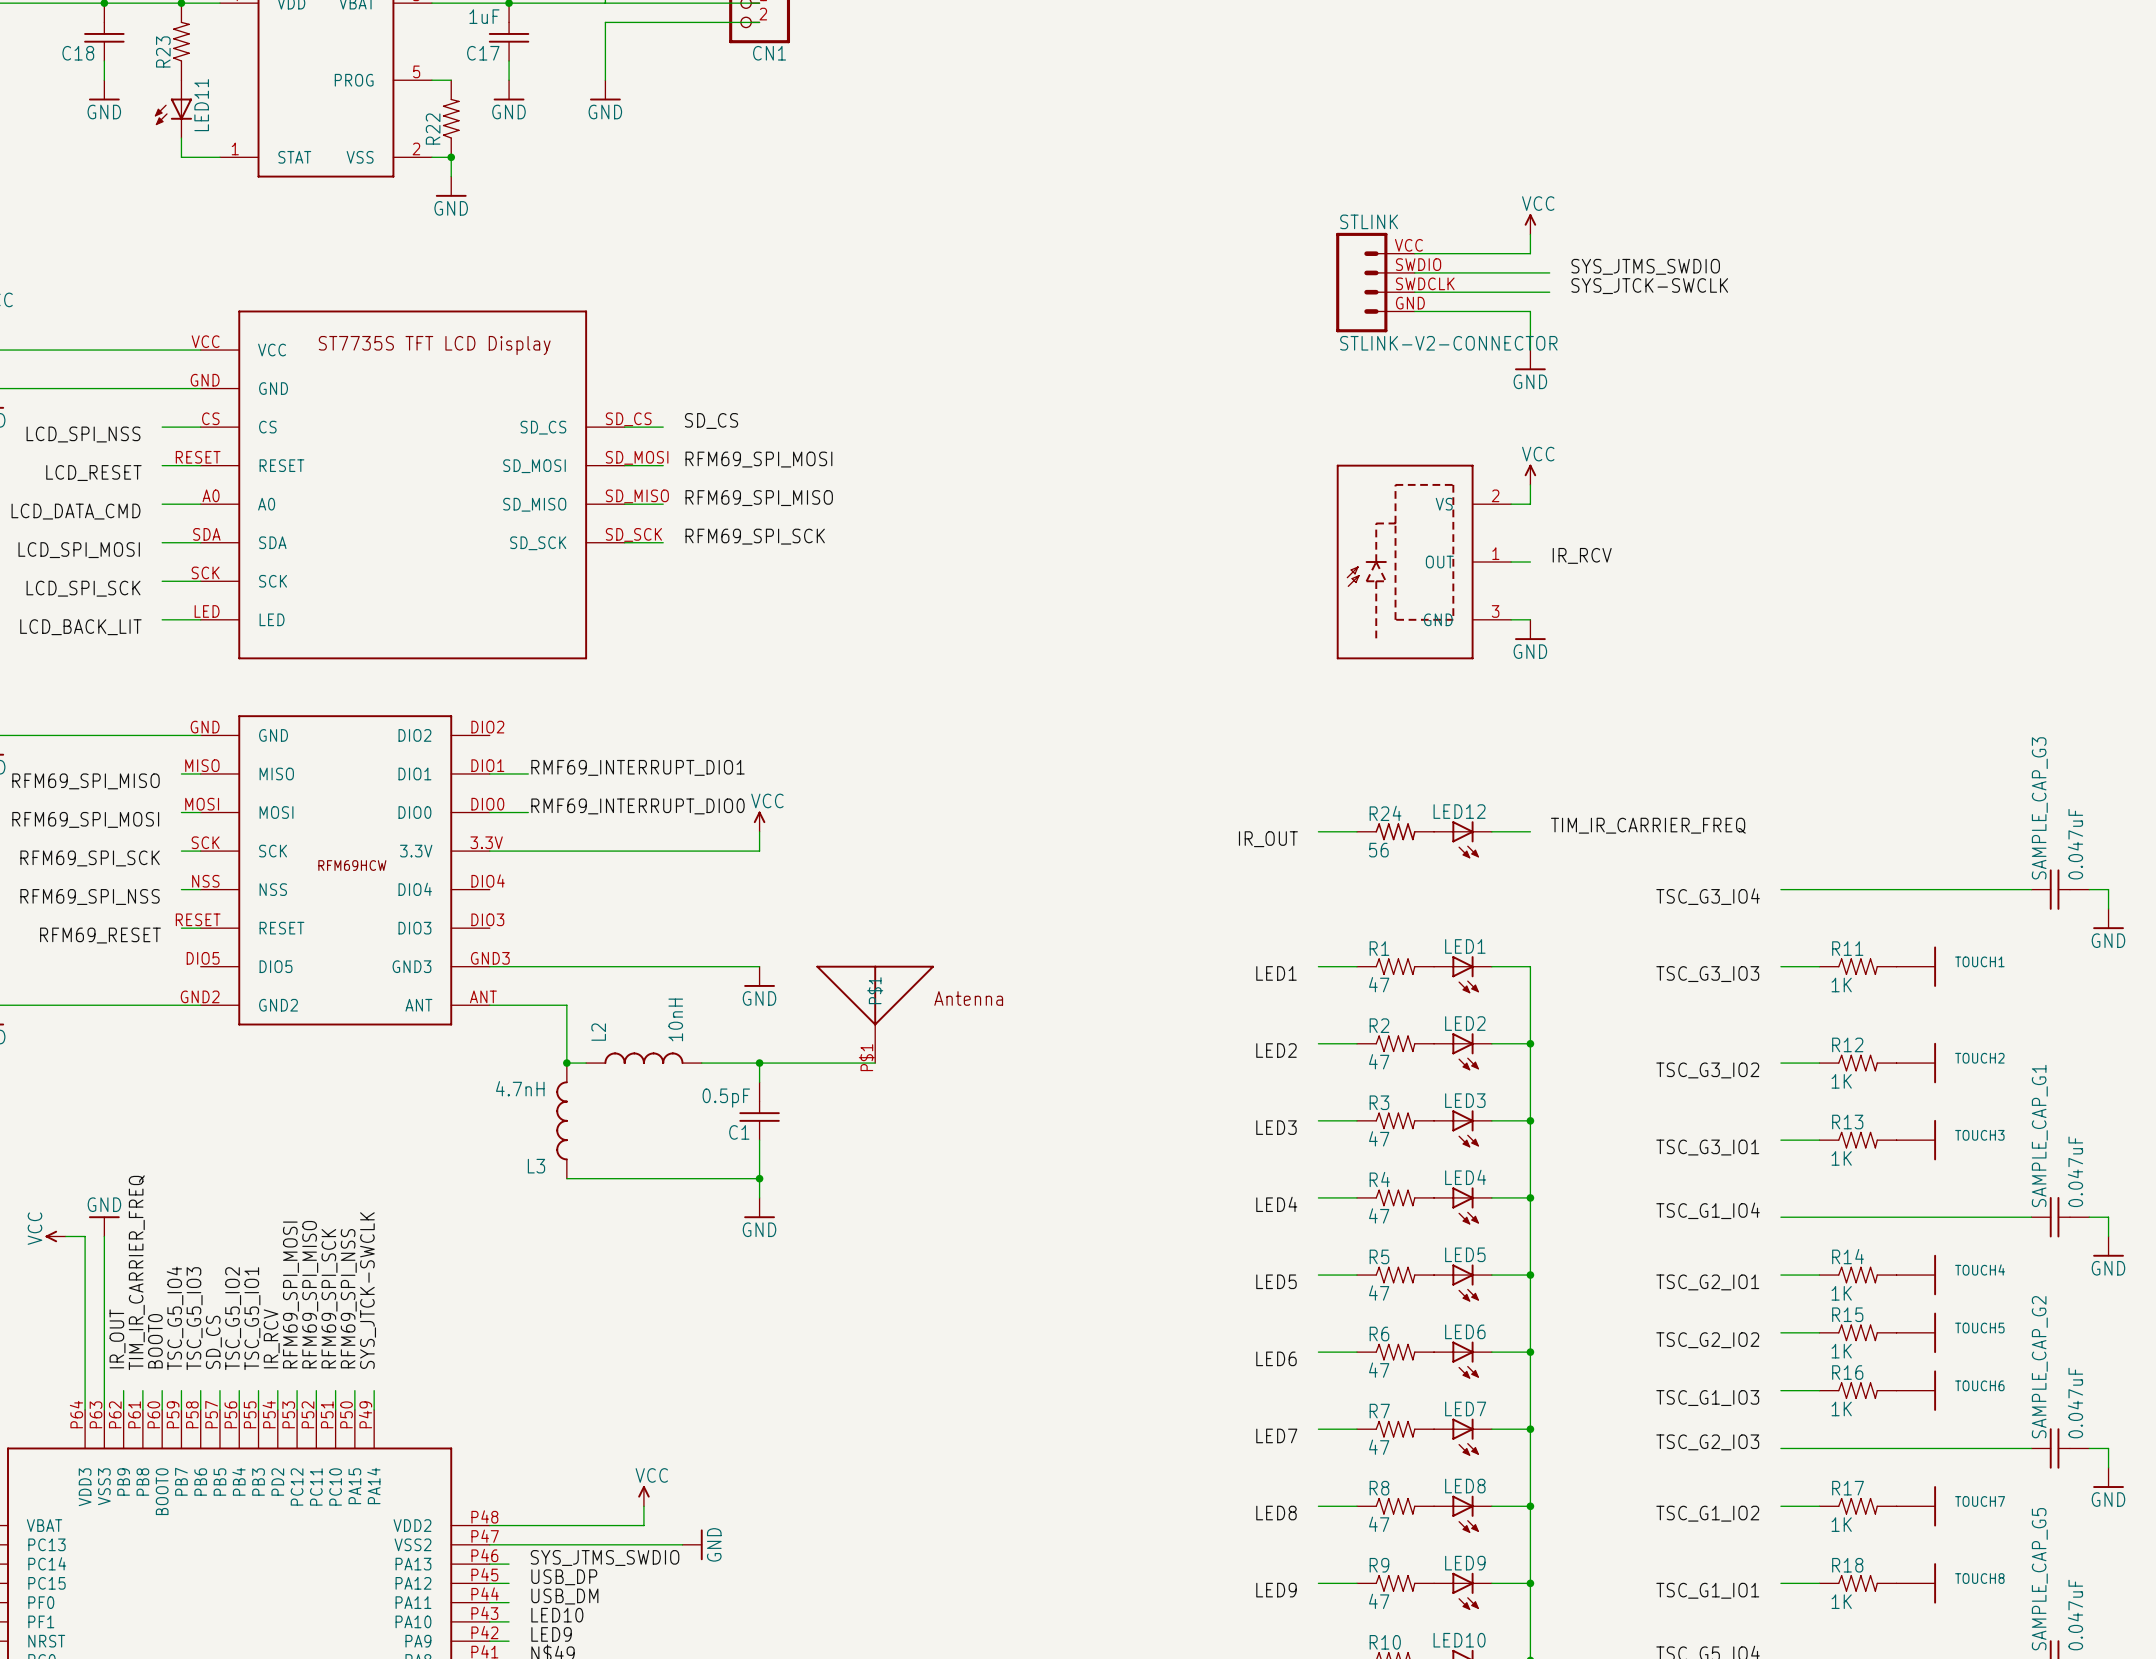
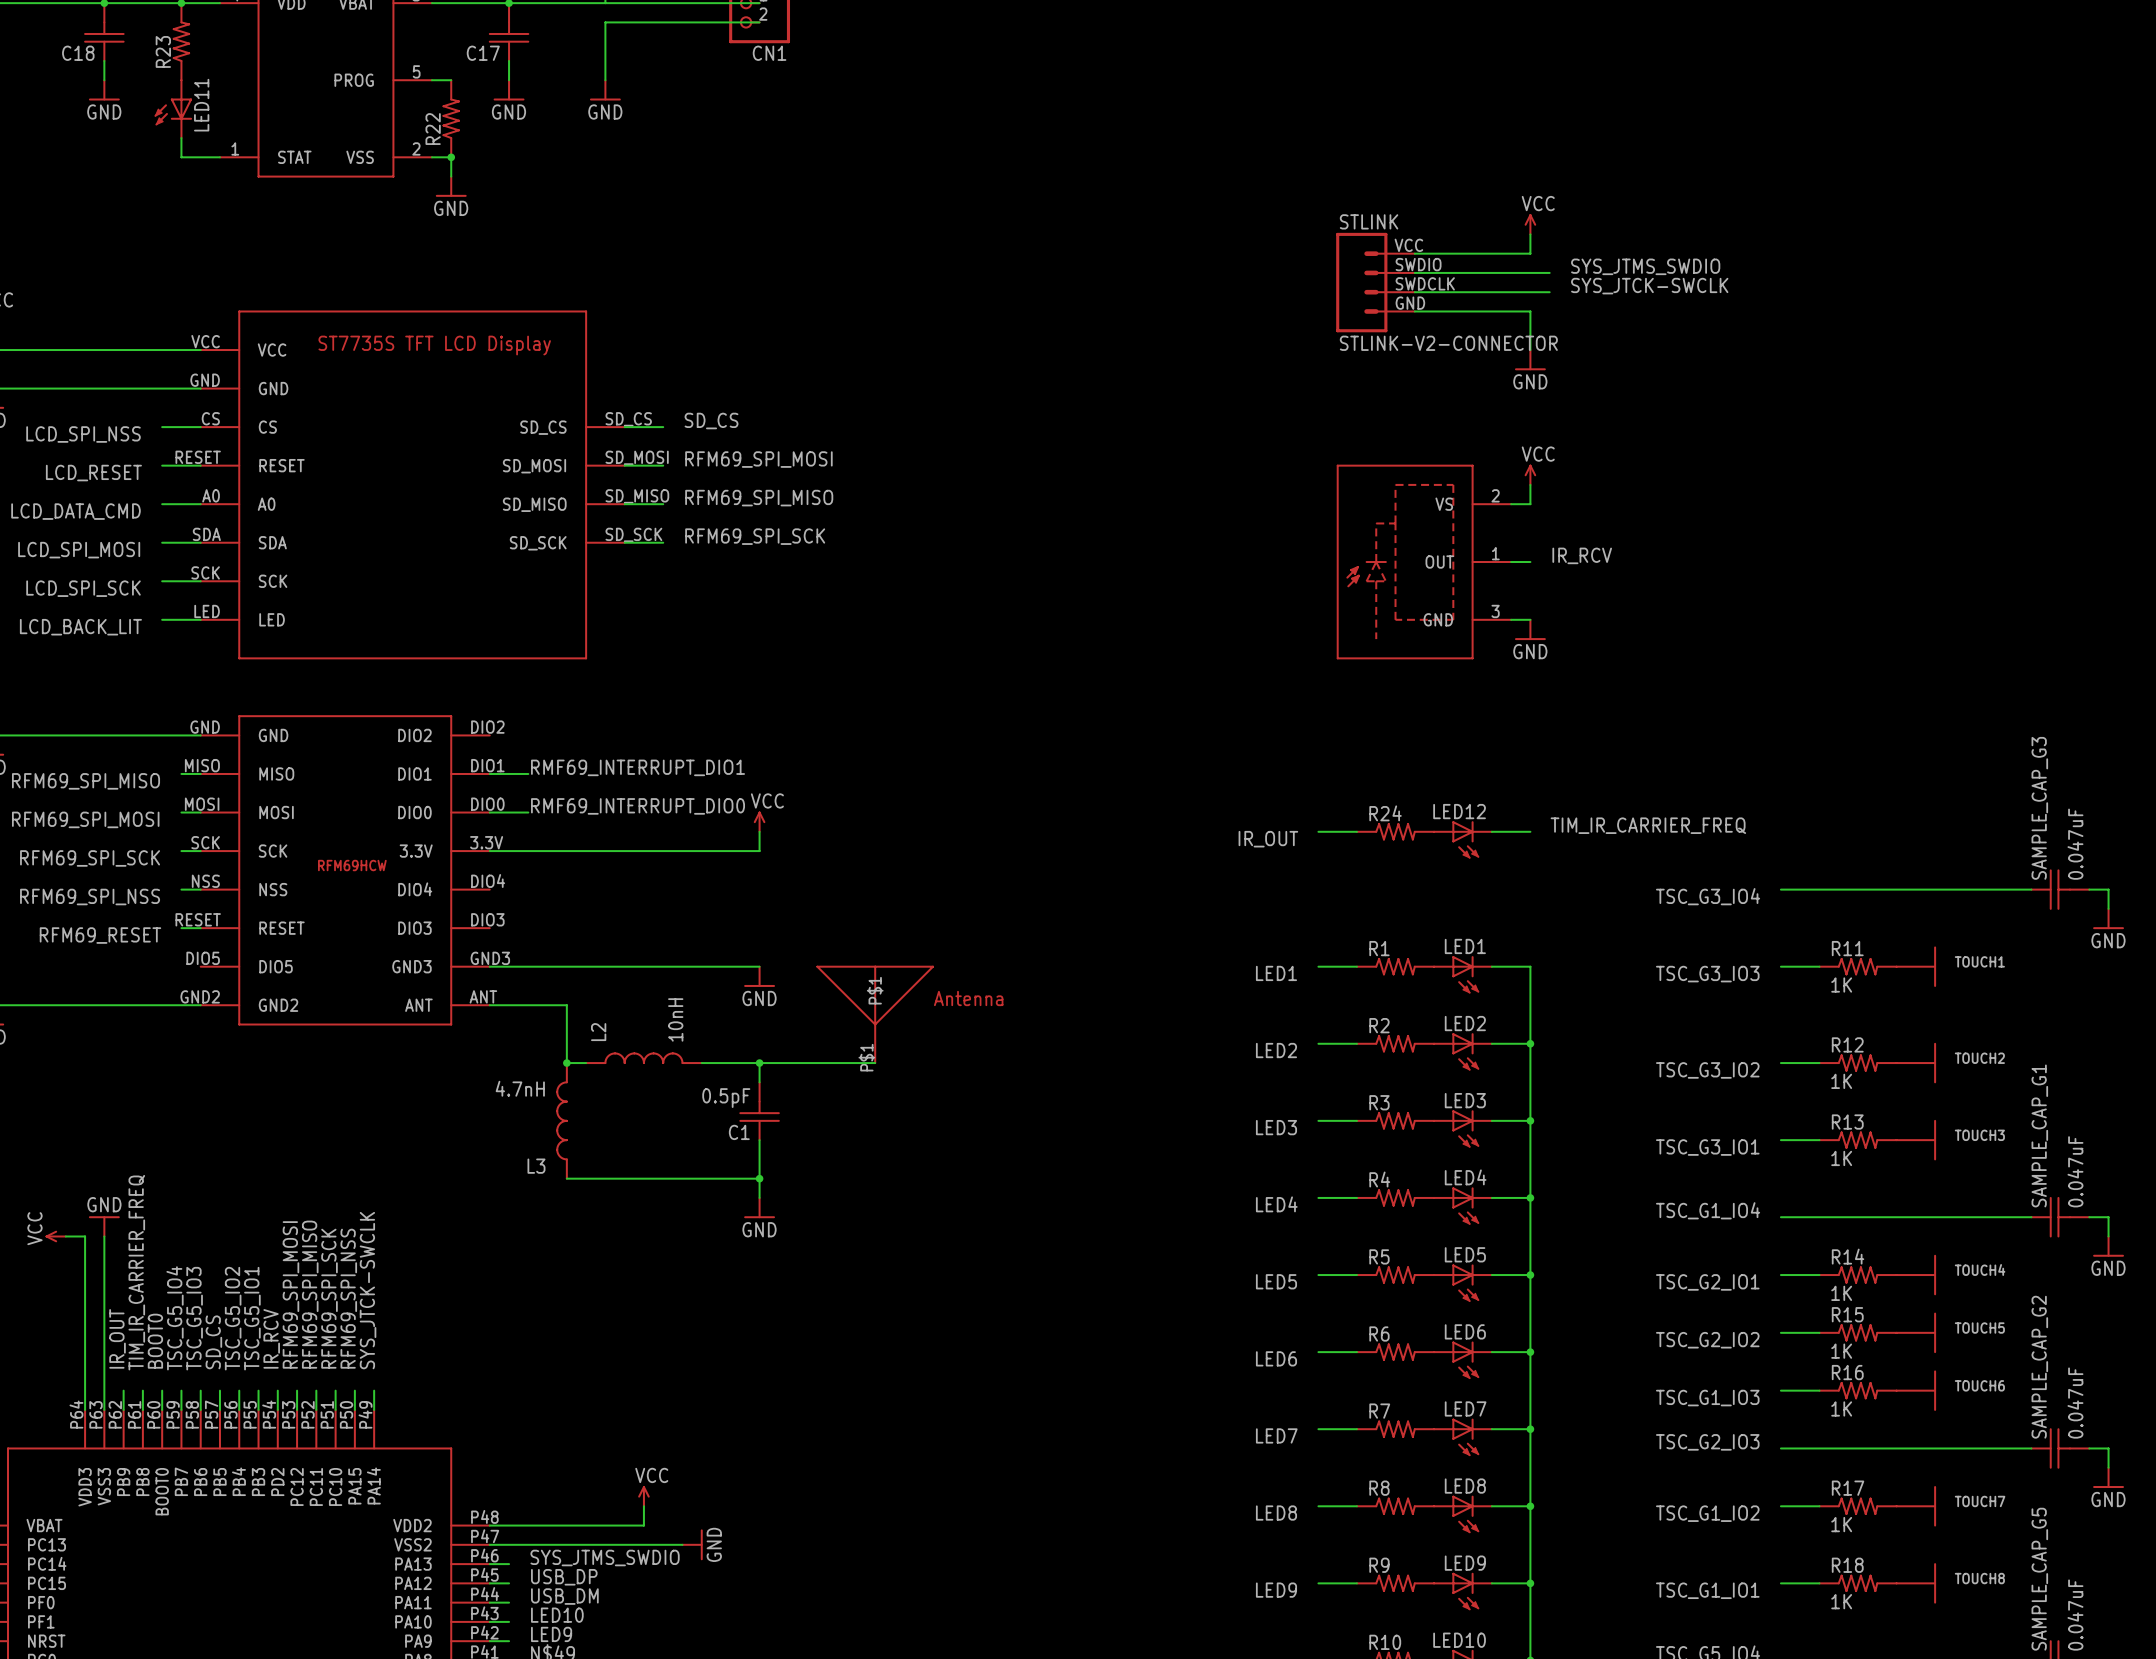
C17 value: 1uF (484, 16) -> none
R24 value: 56 (1378, 850) -> none
R1 value: 47 (1379, 984) -> none
R2 value: 47 (1379, 1061) -> none
R3 value: 47 (1379, 1138) -> none
R4 value: 47 (1379, 1215) -> none
R5 value: 47 (1379, 1293) -> none
R6 value: 47 (1379, 1370) -> none
R7 value: 47 (1379, 1447) -> none
R8 value: 47 (1379, 1524) -> none
R9 value: 47 (1379, 1601) -> none

